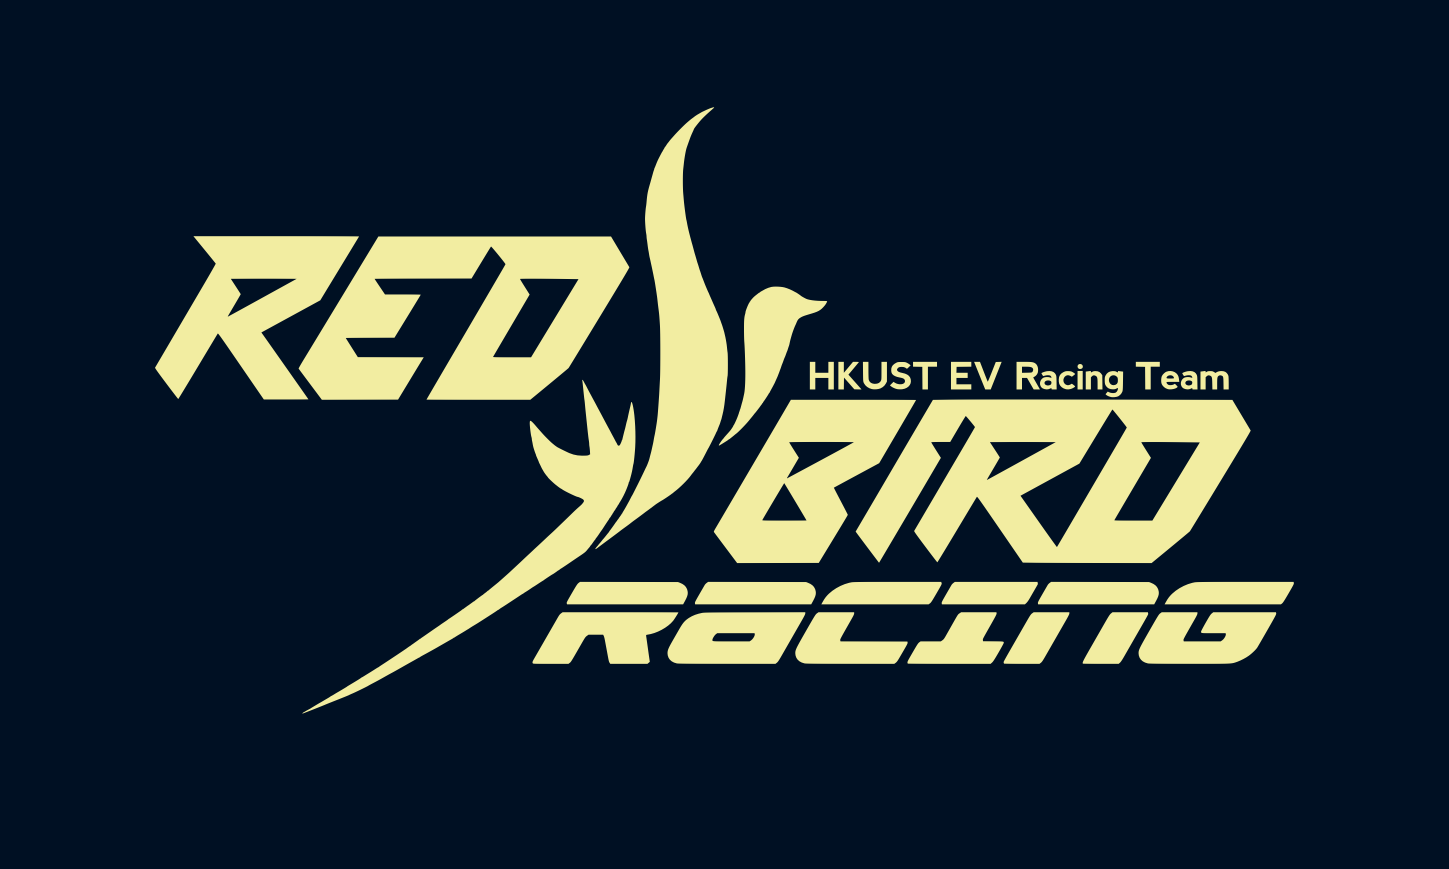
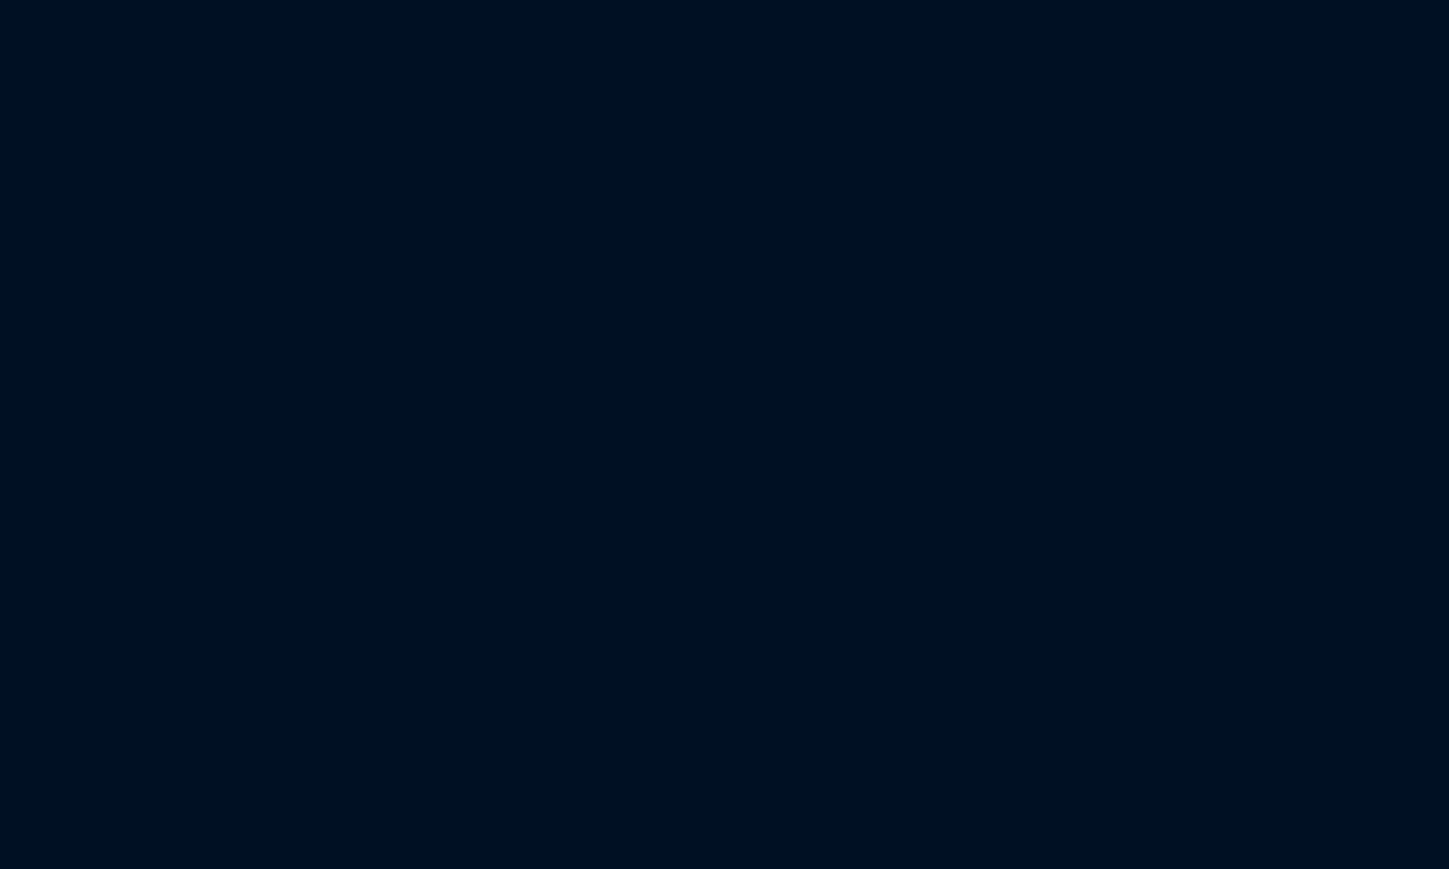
drawing: [155, 107, 1294, 714] -> none

